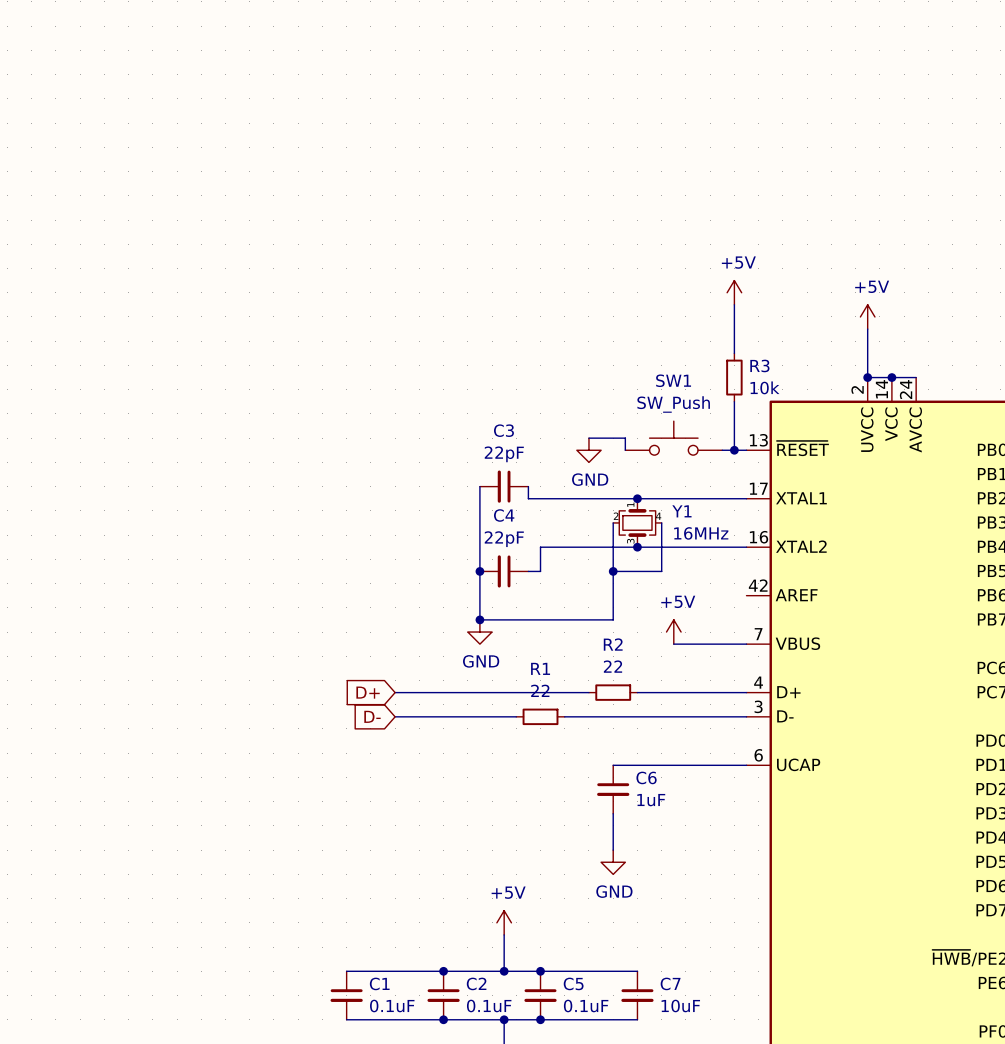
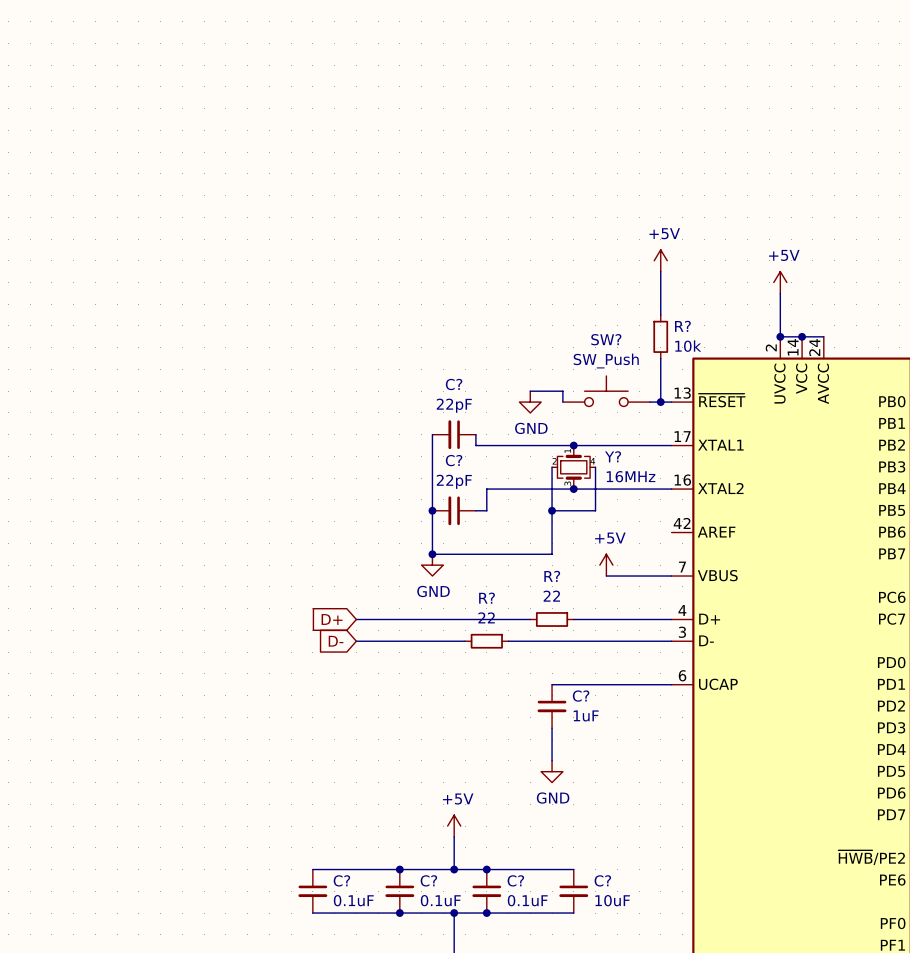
R3 name: R3 (759, 365) -> R? (682, 326)
SW1 name: SW1 (673, 380) -> SW? (606, 339)
C3 name: C3 (503, 430) -> C? (454, 384)
Y1 name: Y1 (681, 511) -> Y? (613, 456)
C4 name: C4 (504, 515) -> C? (454, 460)
R2 name: R2 (613, 644) -> R? (552, 576)
R1 name: R1 (540, 668) -> R? (487, 598)
C6 name: C6 (646, 777) -> C? (581, 696)
C1 name: C1 (379, 983) -> C? (341, 880)
C2 name: C2 (476, 983) -> C? (428, 880)
C5 name: C5 (573, 983) -> C? (515, 880)
C7 name: C7 (670, 983) -> C? (602, 880)

